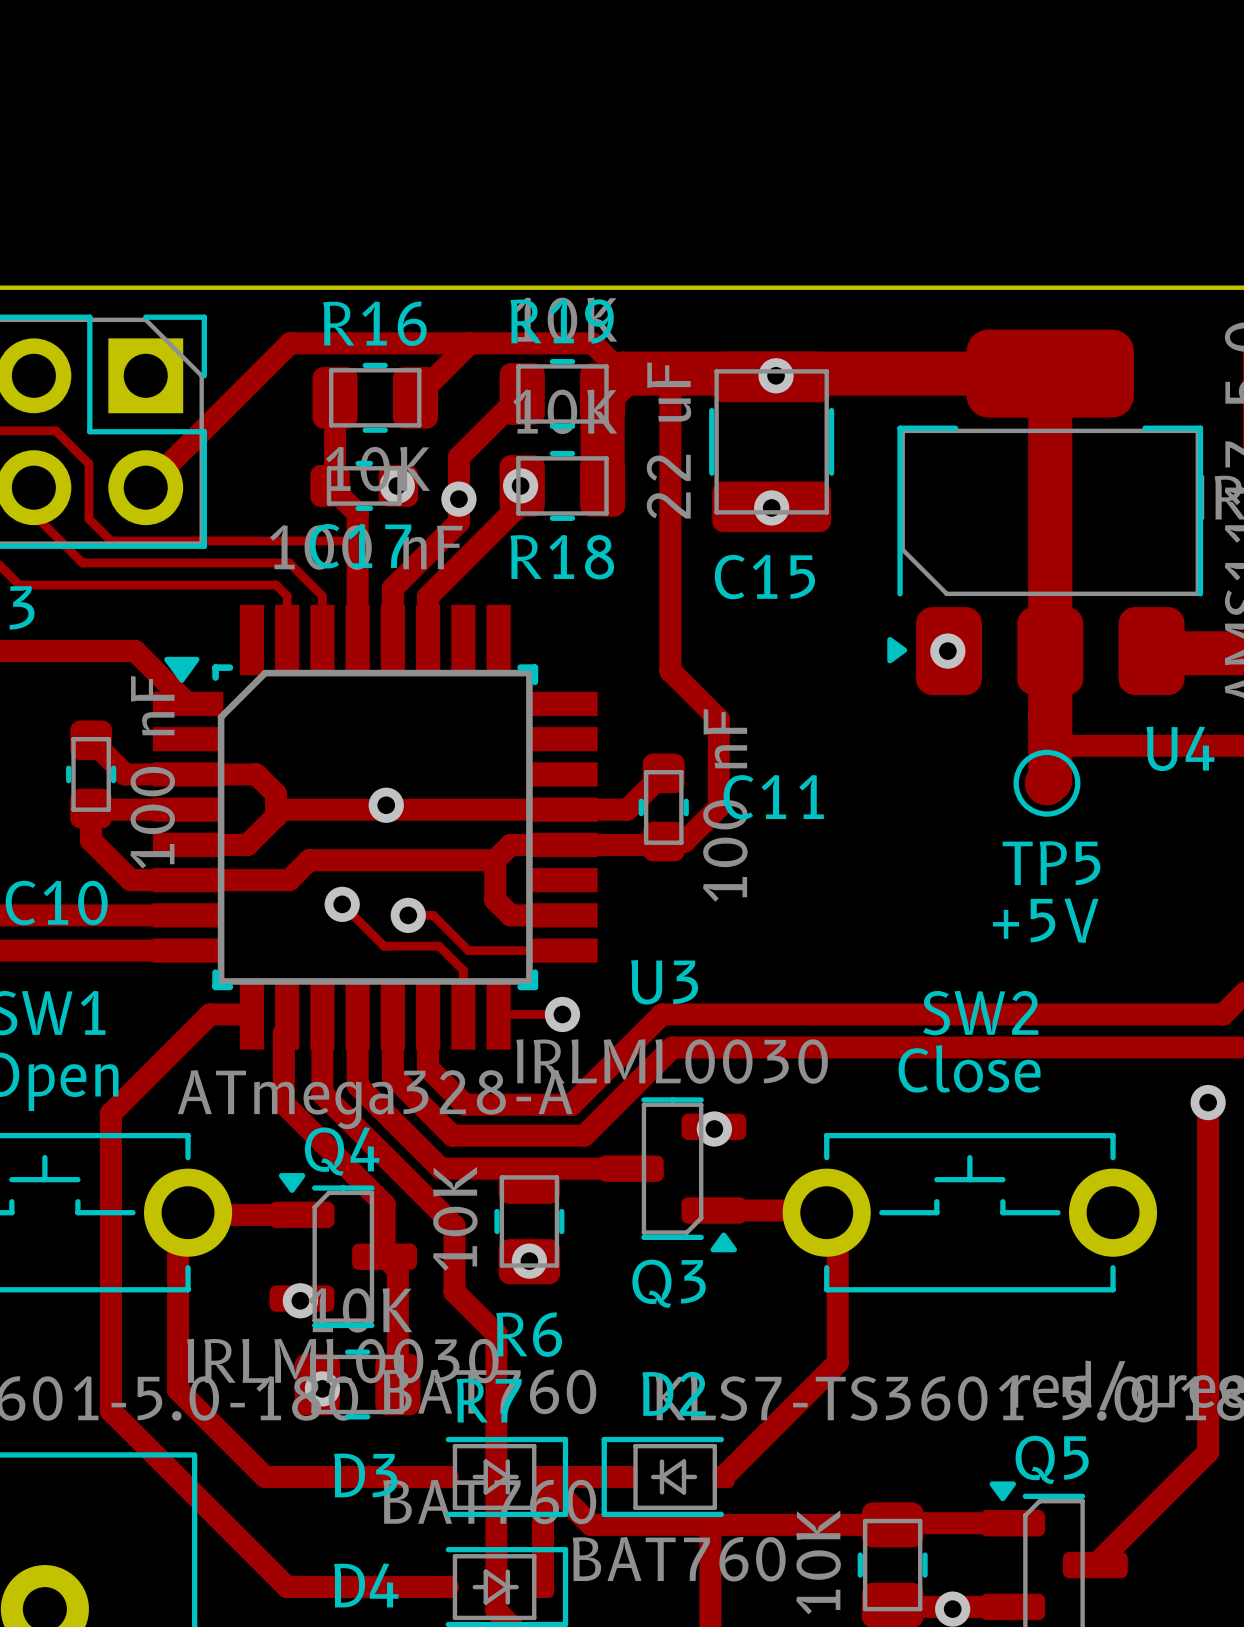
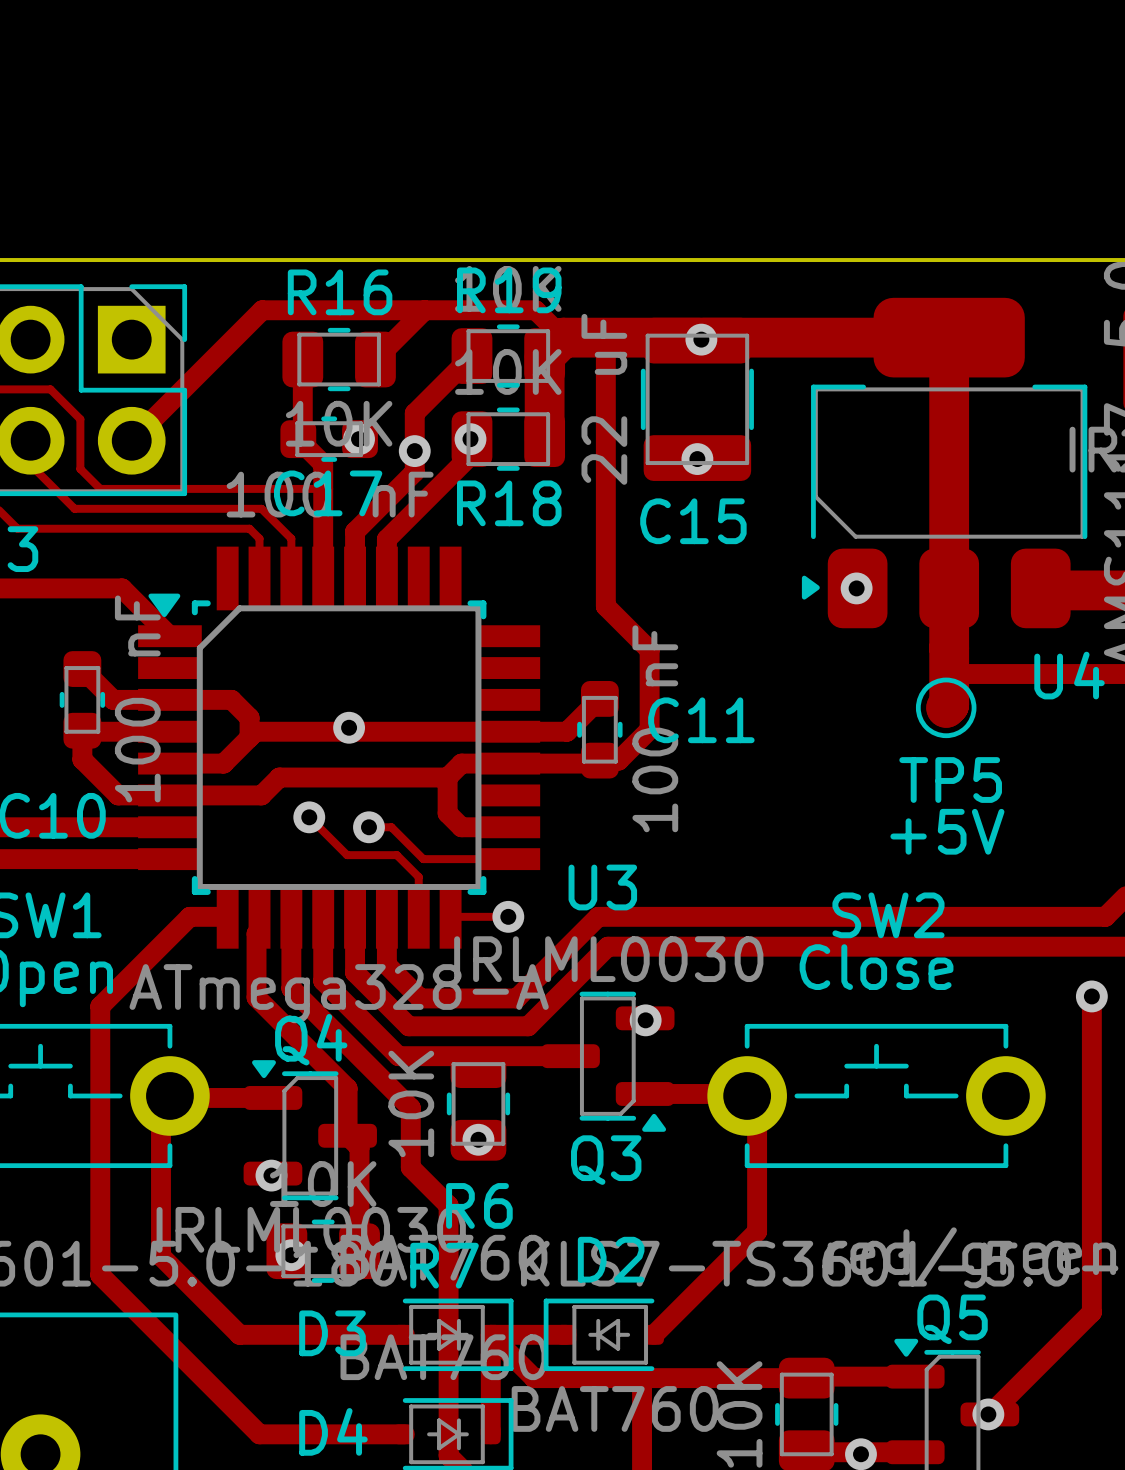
via: none -> (988, 1414)

